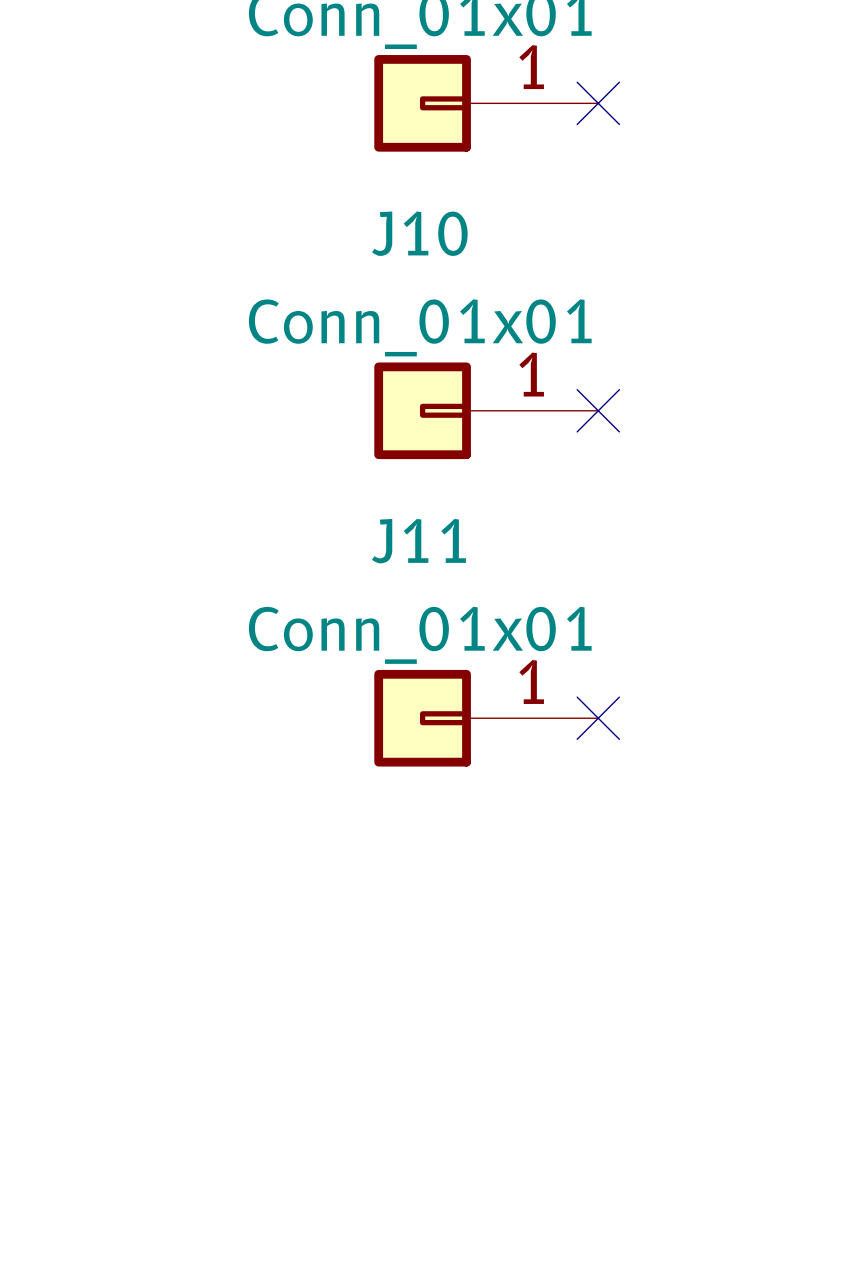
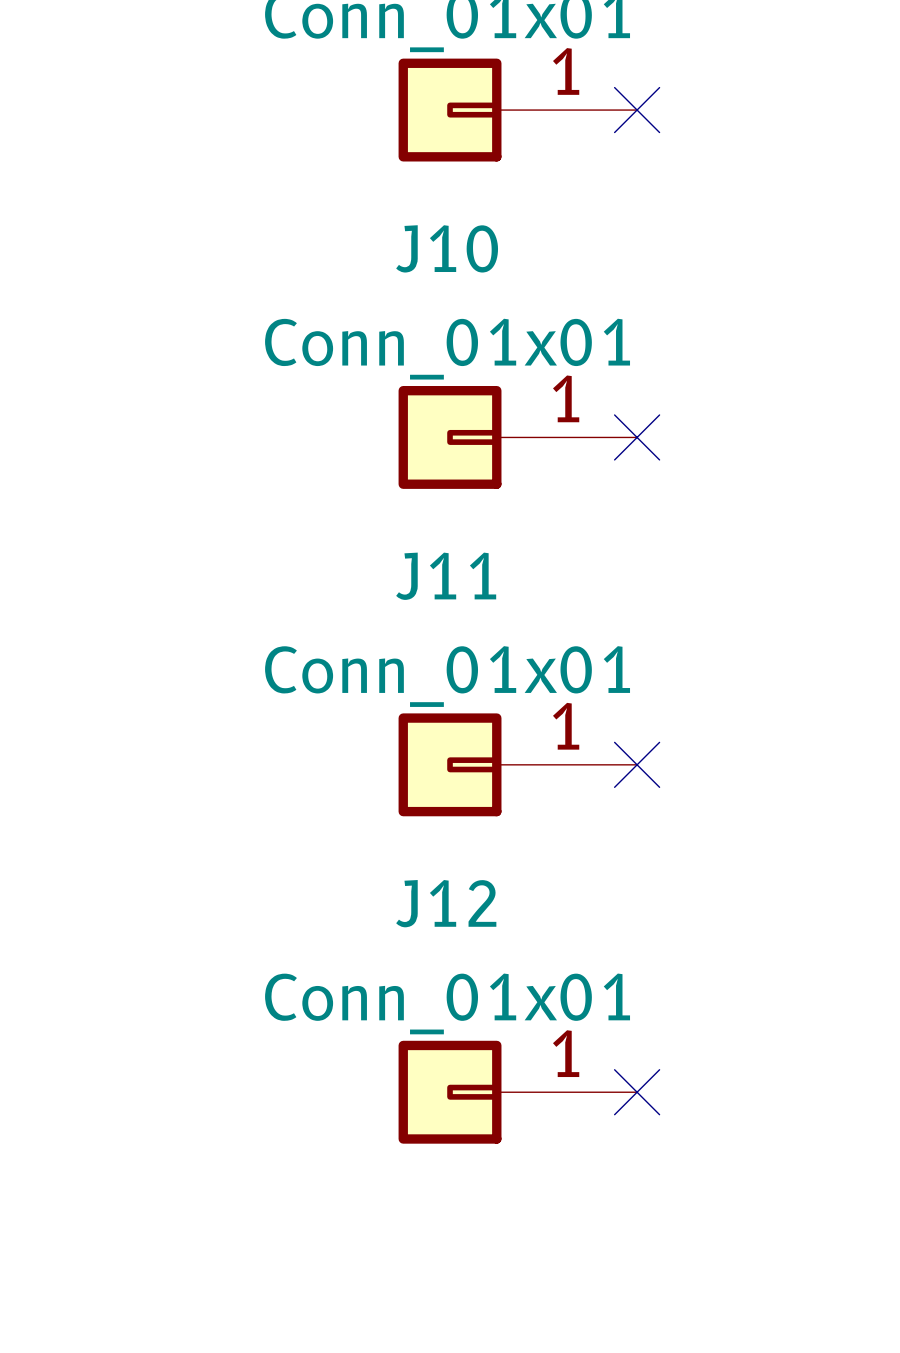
J12: none -> Conn_01x01 (517, 1092)
no-connect mark: none -> (637, 1092)

